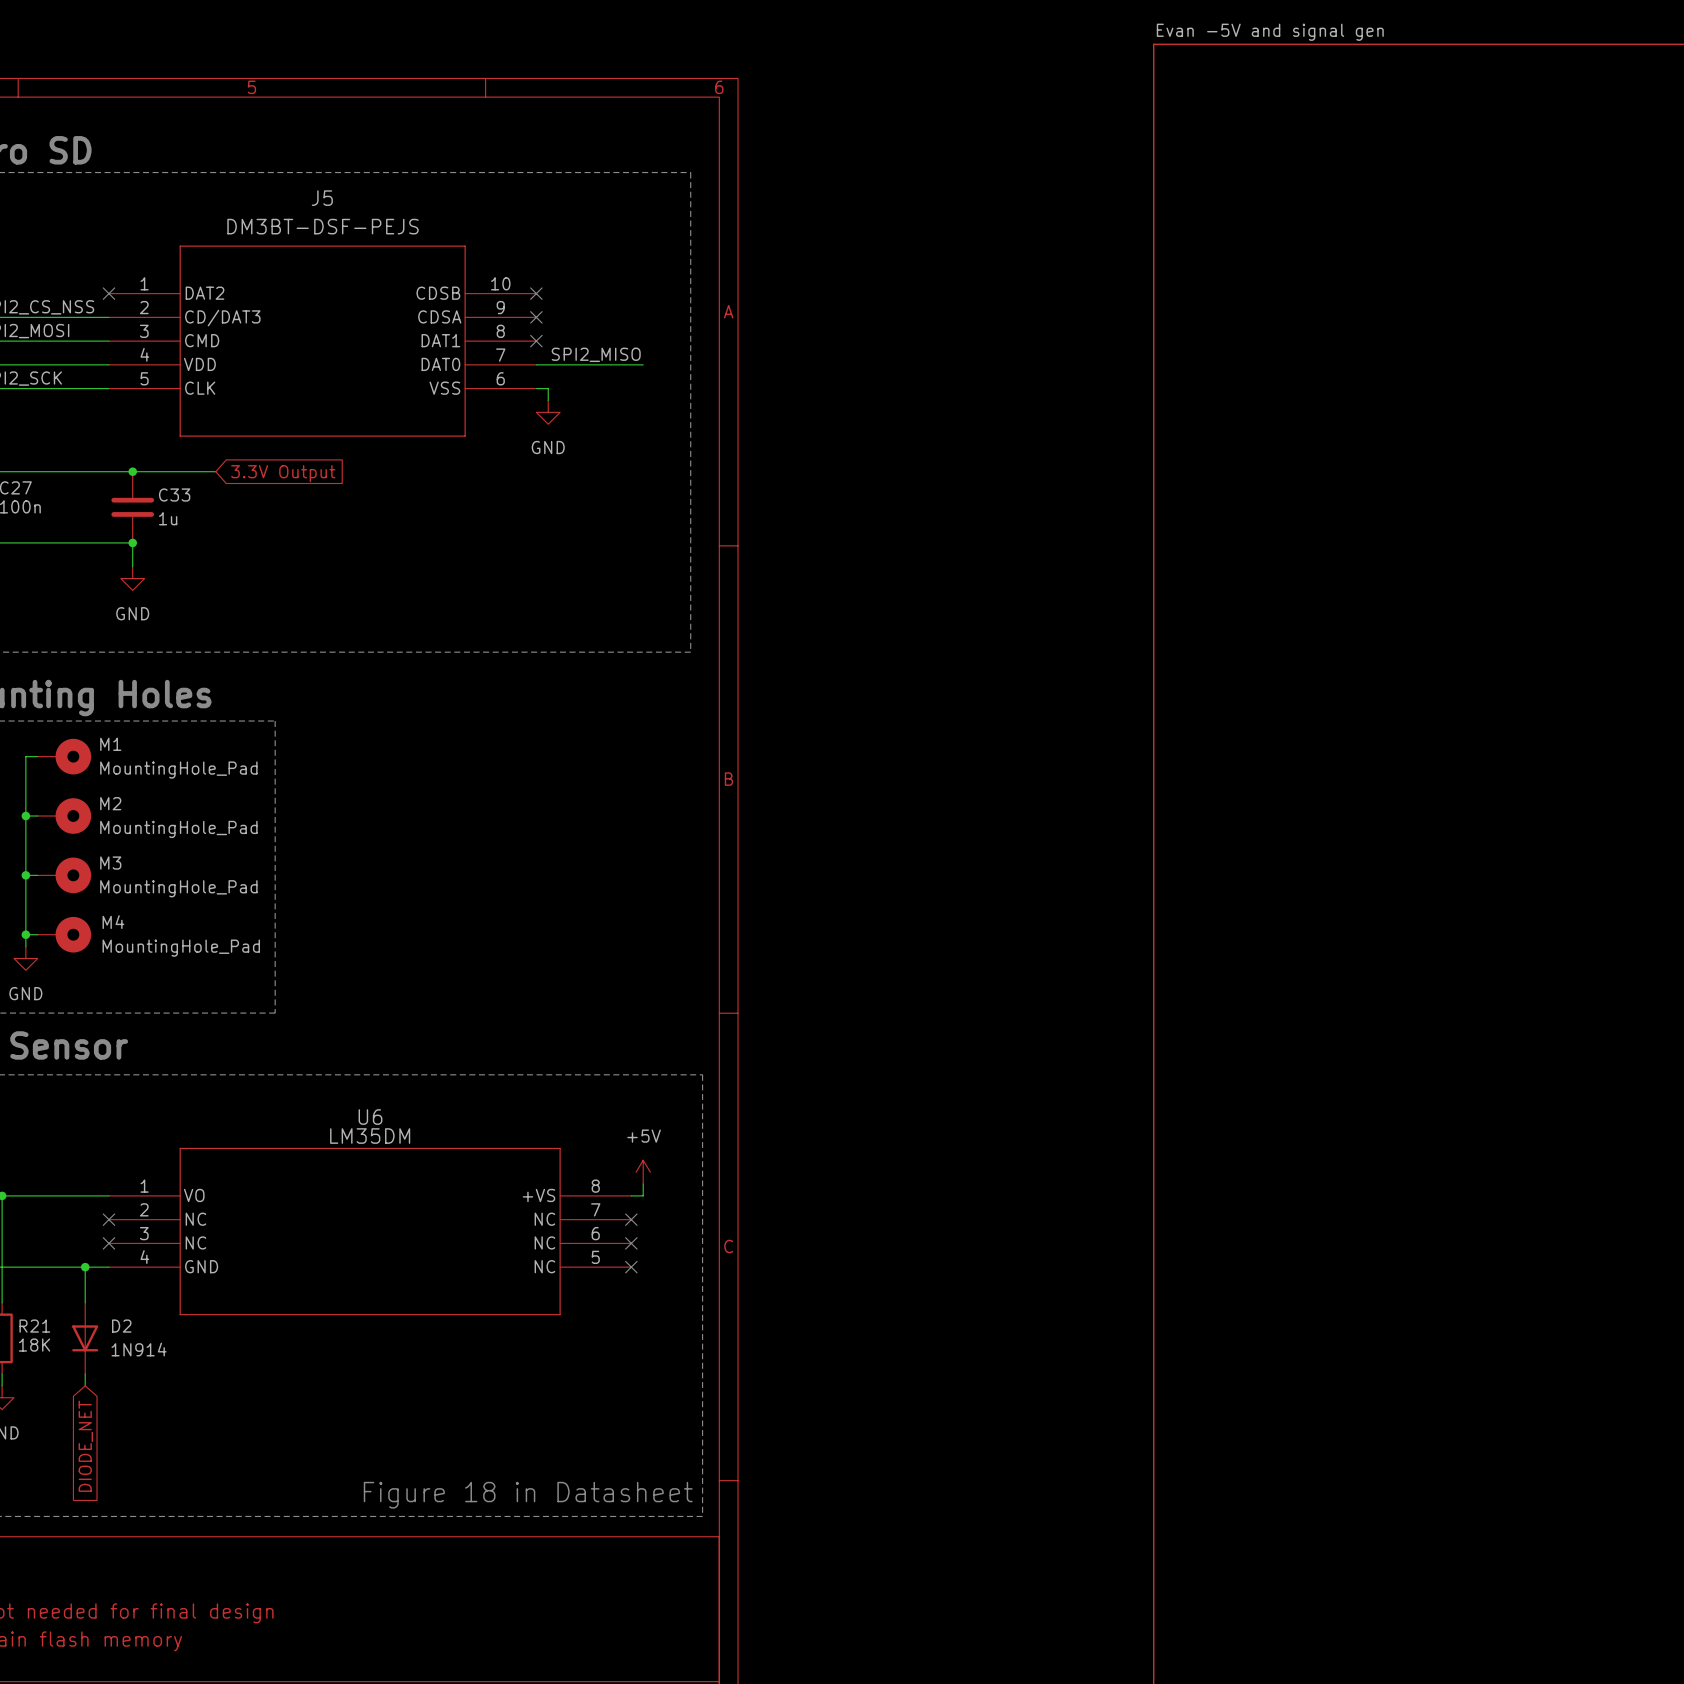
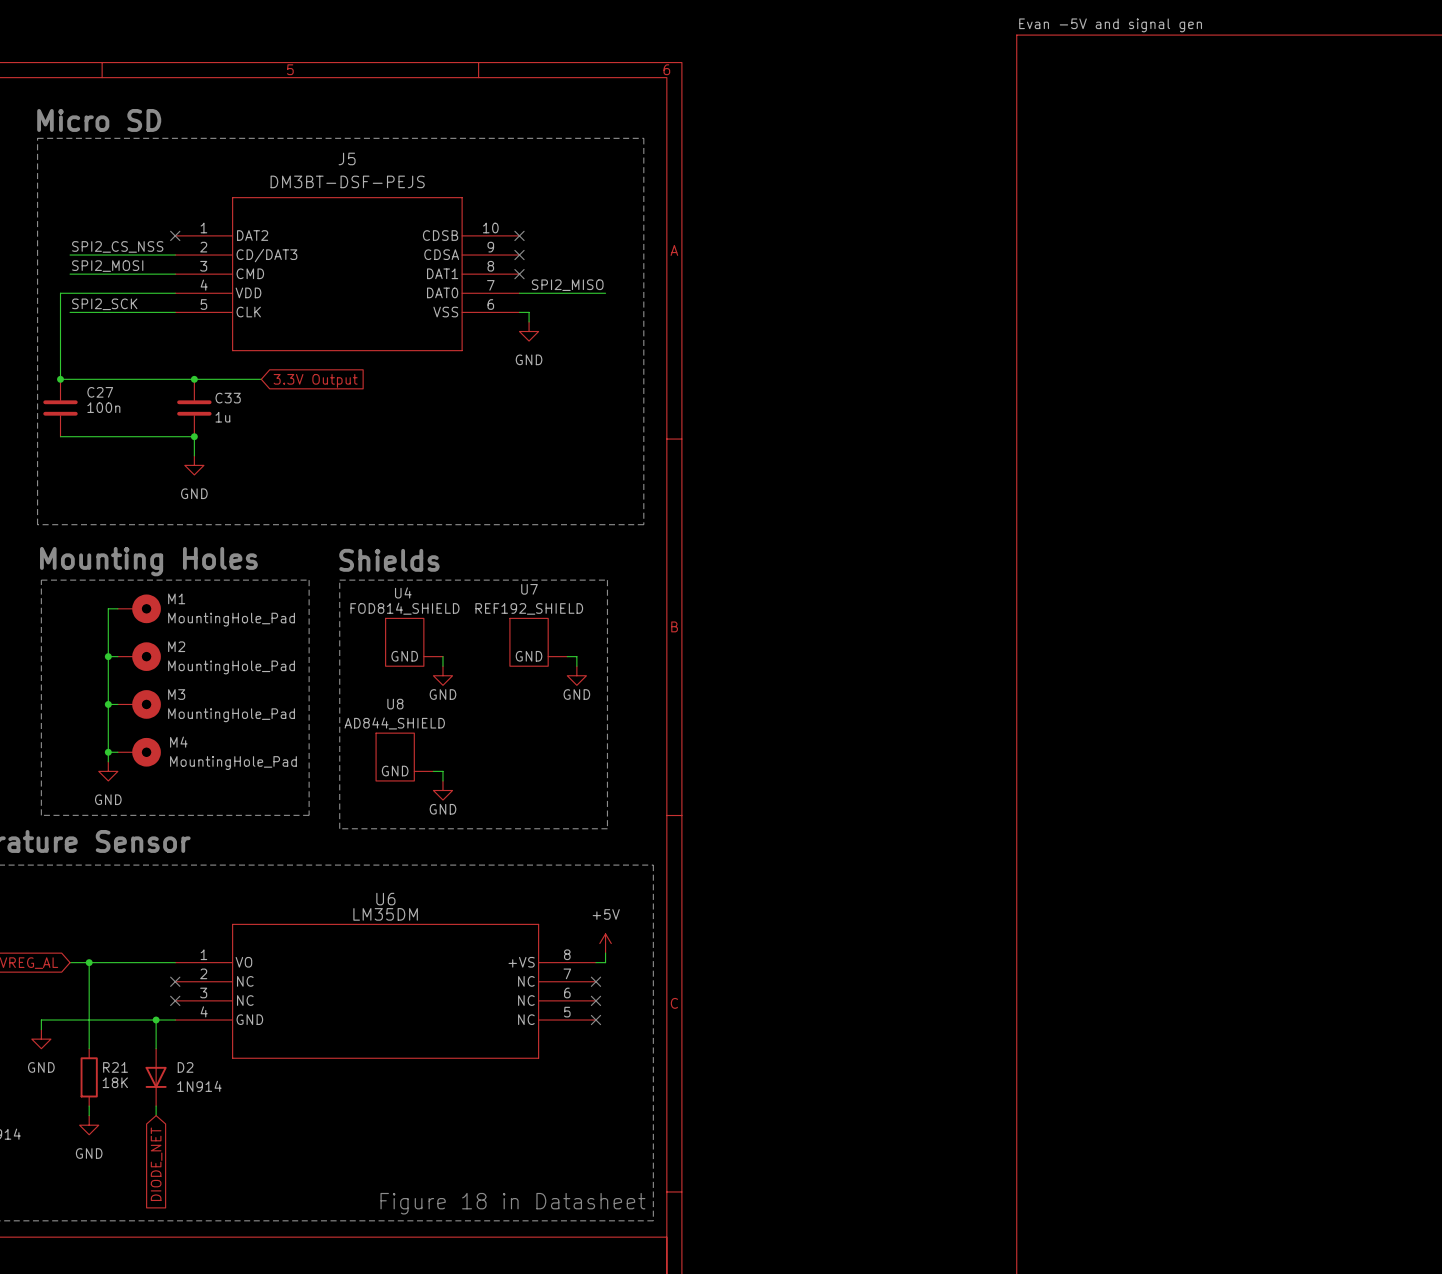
text: none -> Shields (389, 560)
line: none -> (339, 580) (607, 580) (607, 828) (339, 828) (339, 580)
U4: none -> FOD814_SHIELD (414, 642)
U7: none -> REF192_SHIELD (538, 642)
wire: none -> (442, 656) (442, 666)
wire: none -> (567, 656) (576, 656) (576, 666)
power symbol: none -> GND (442, 675)
power symbol: none -> GND (576, 675)
U8: none -> AD844_SHIELD (404, 757)
wire: none -> (433, 771) (442, 771) (442, 780)
power symbol: none -> GND (442, 790)

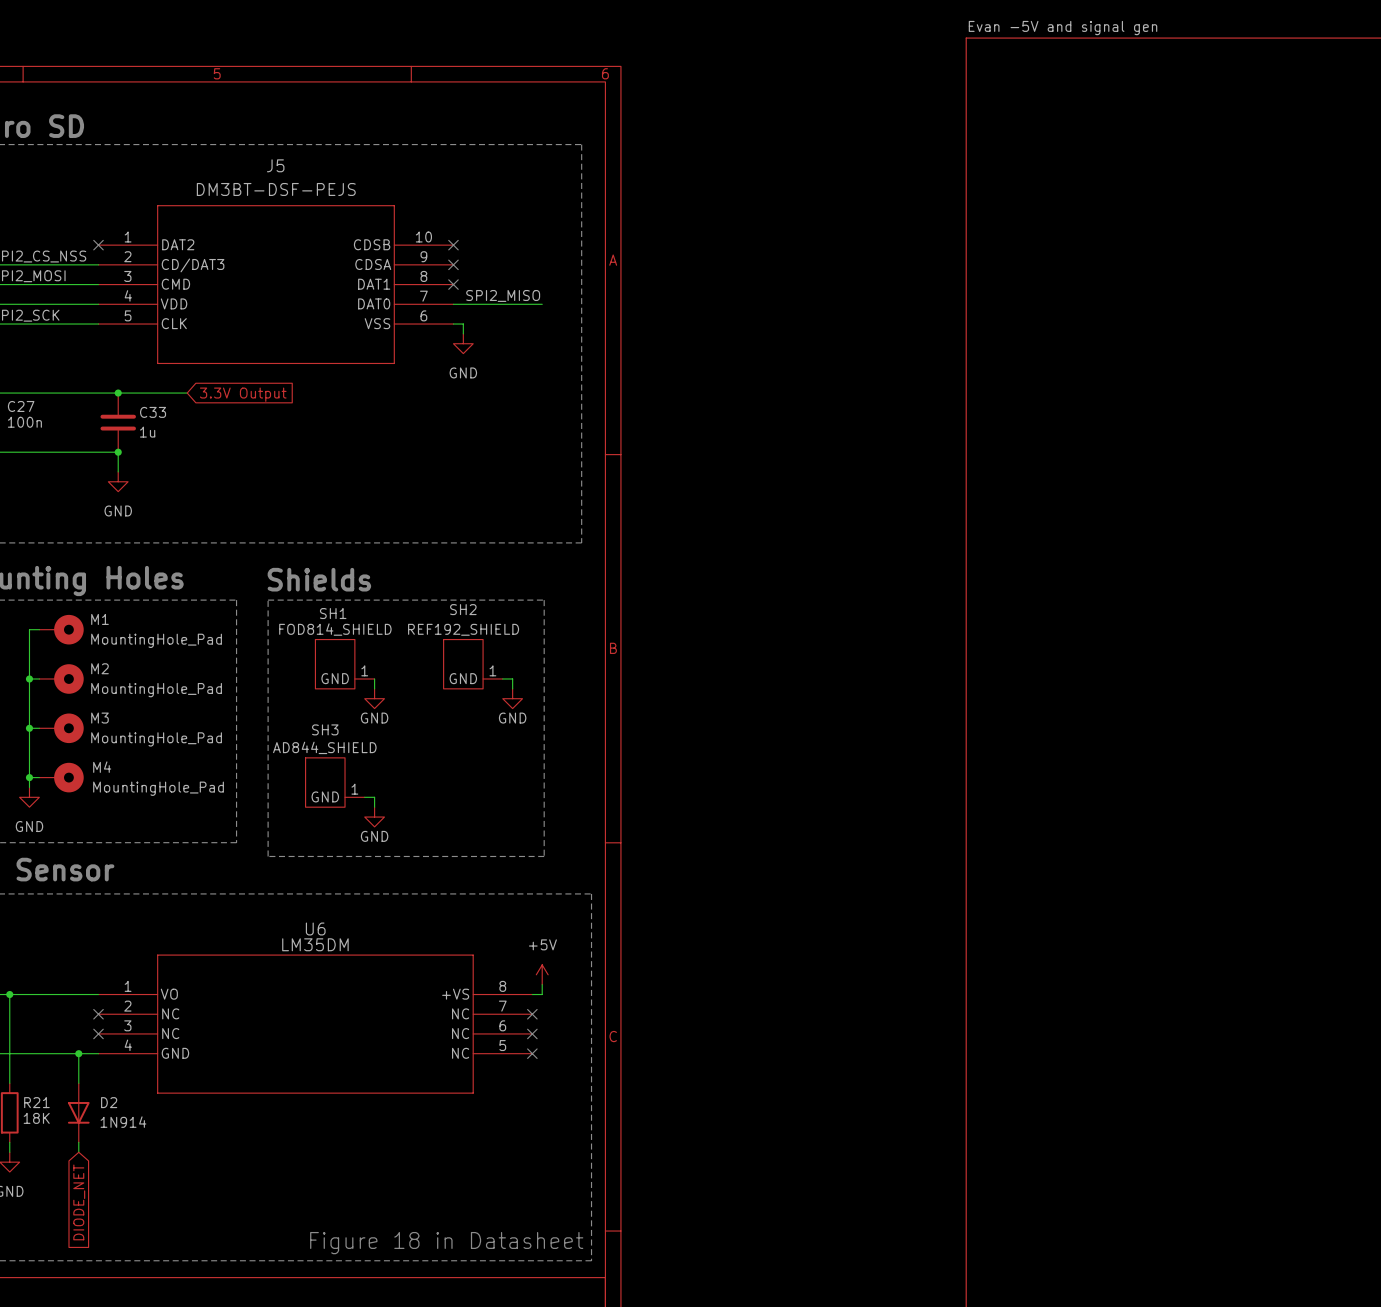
U7 name: U7 (529, 589) -> SH2 (463, 609)
U4 name: U4 (403, 592) -> SH1 (333, 613)
U4 pin number: none -> 1 (364, 670)
U7 pin number: none -> 1 (492, 670)
U8 name: U8 (395, 704) -> SH3 (325, 729)
U8 pin number: none -> 1 (354, 789)

